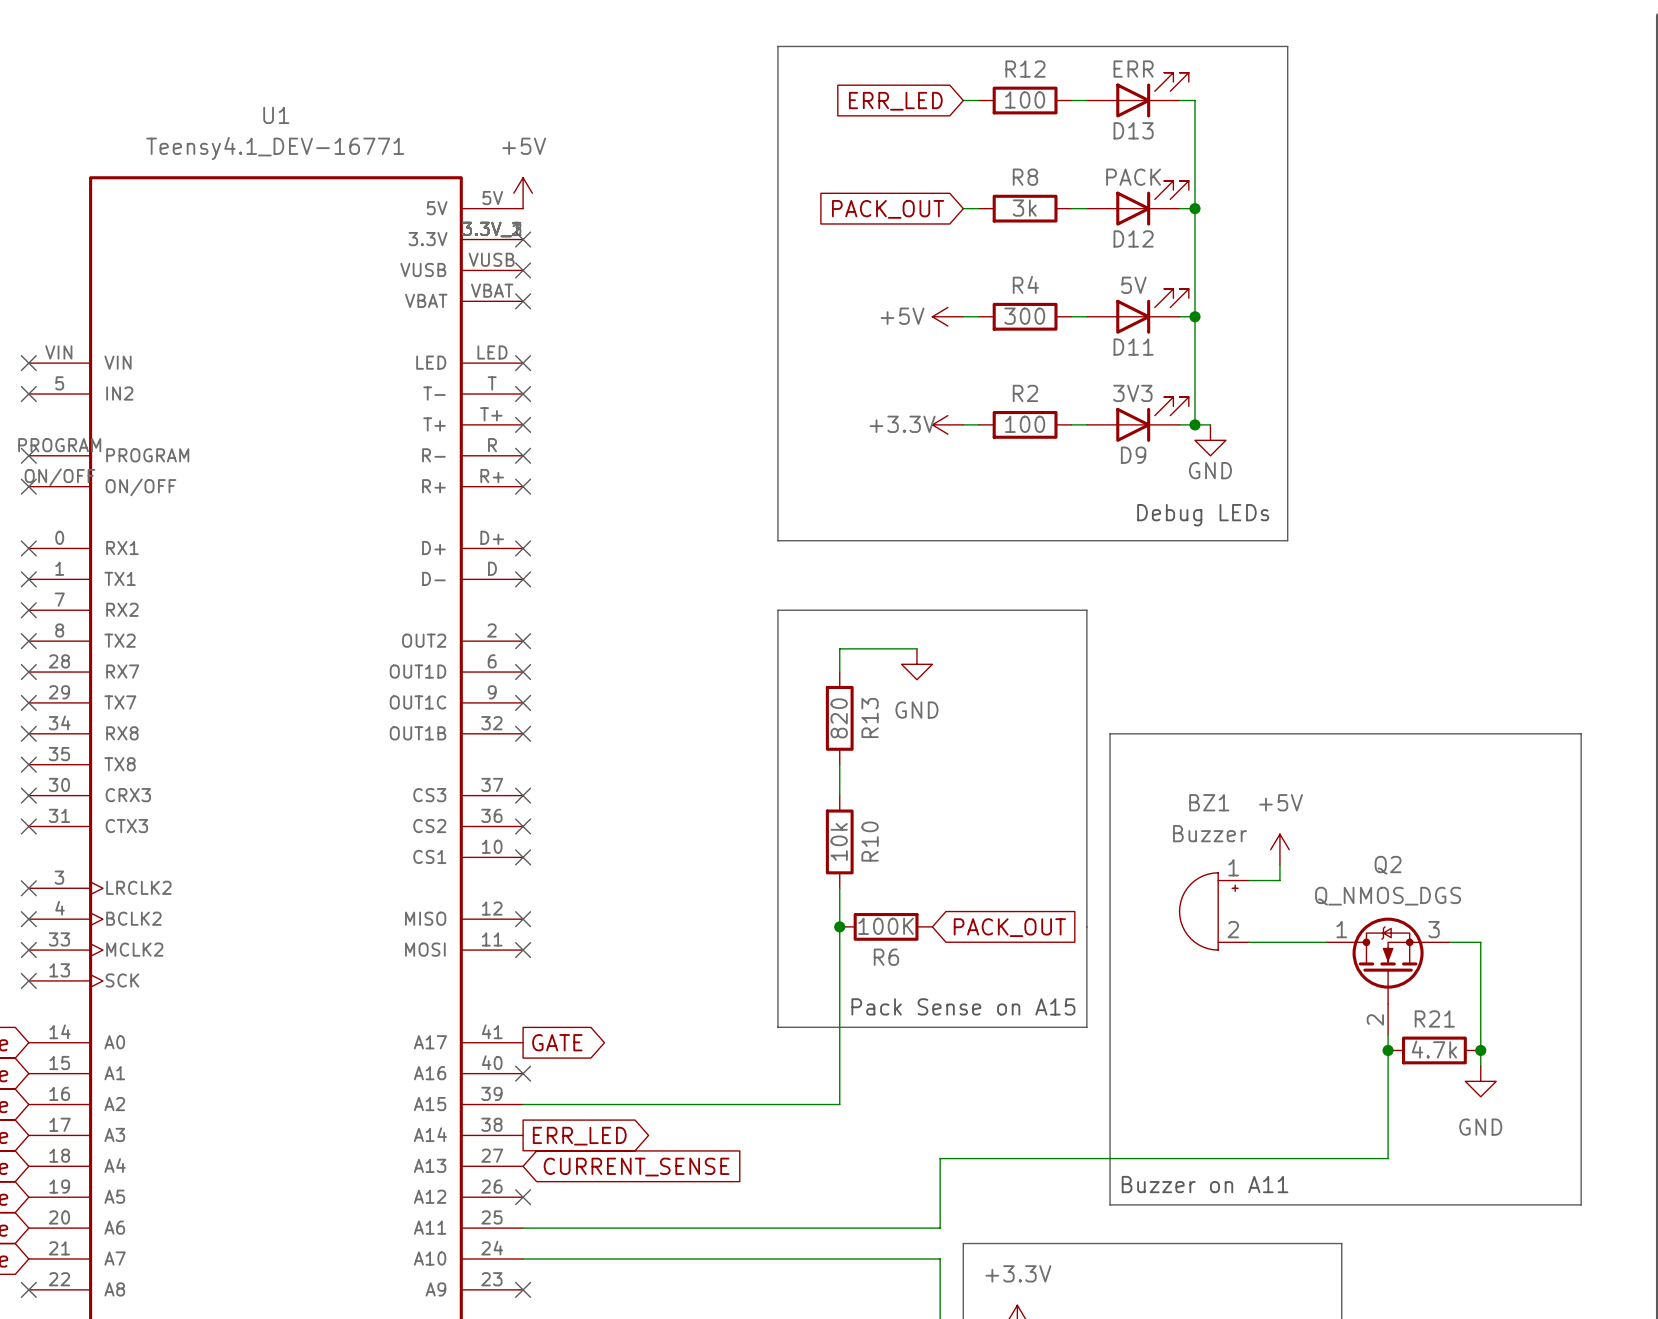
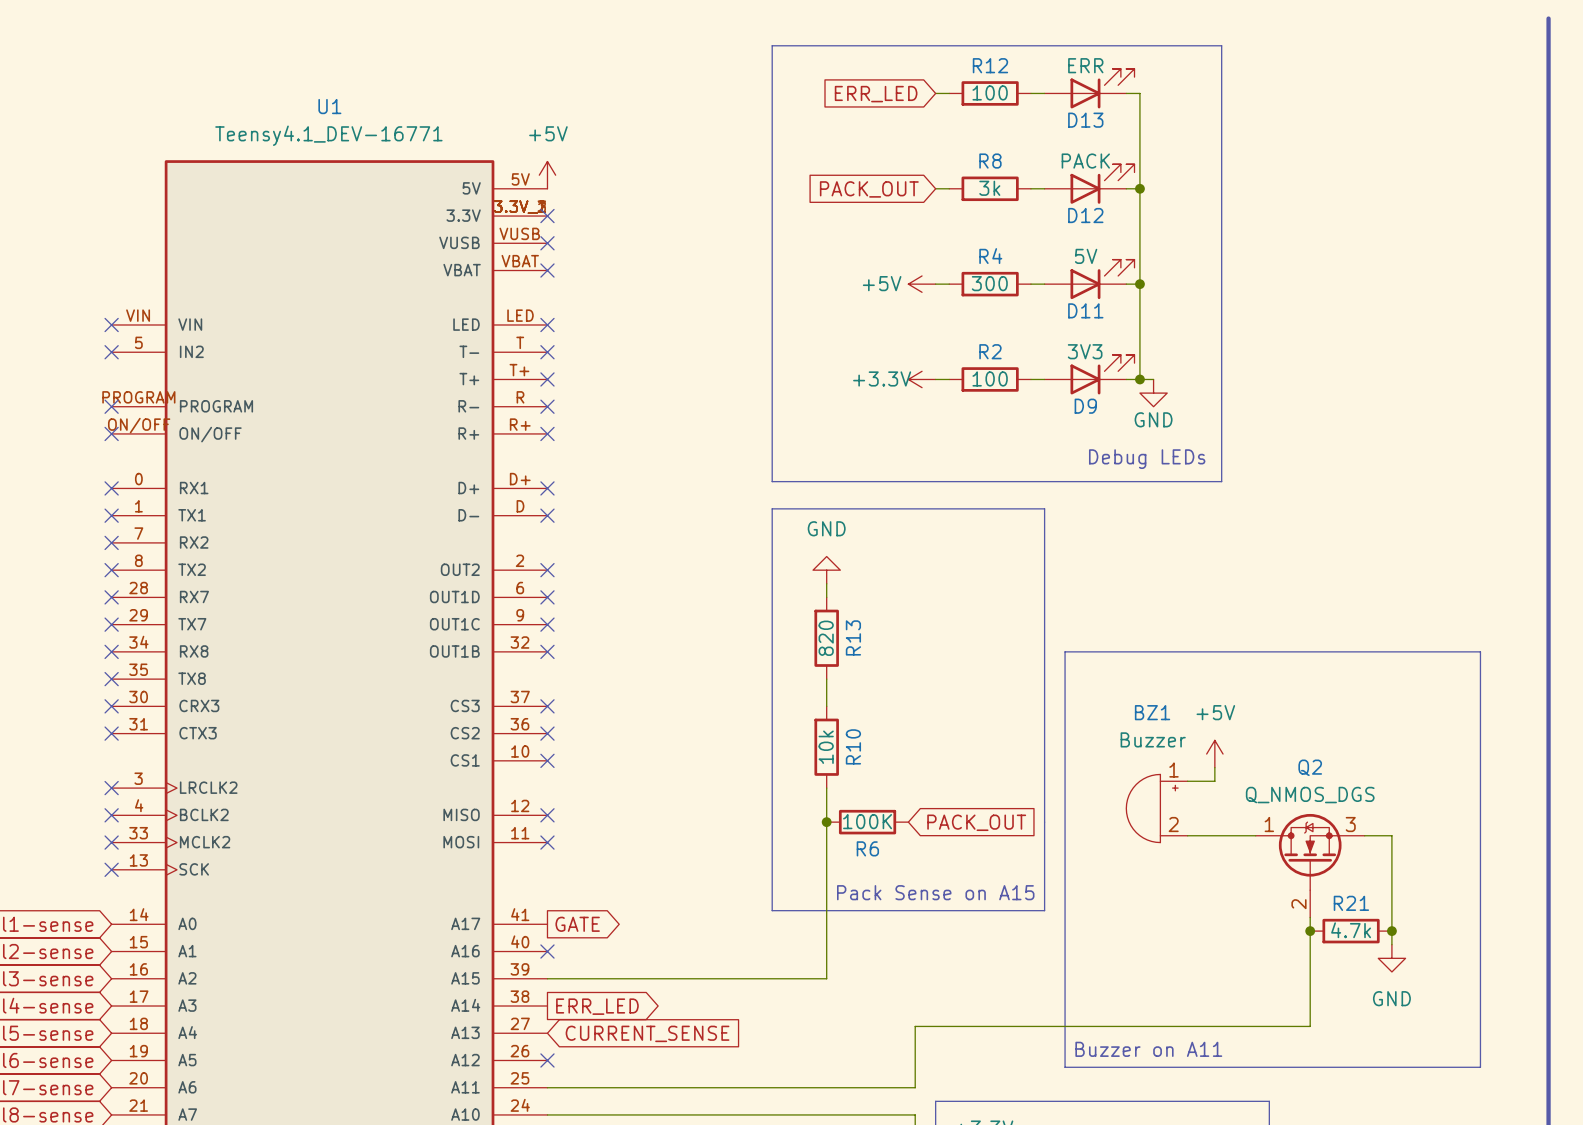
line: (777, 610) (1086, 610) -> (772, 542) (772, 508) (1044, 508) (1044, 542)
wire: (916, 648) (839, 648) (839, 656) -> none
power symbol rotation: 0° (916, 664) -> 180° (826, 570)
power symbol position: GND (916, 664) -> GND (826, 570)

